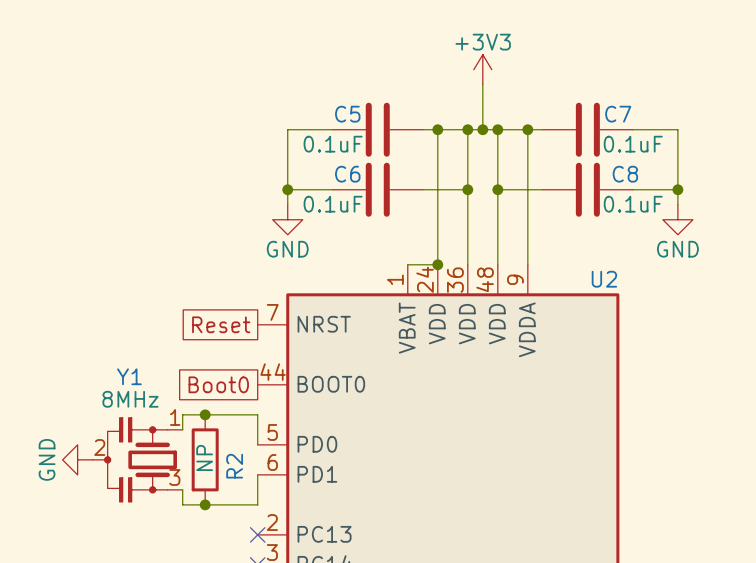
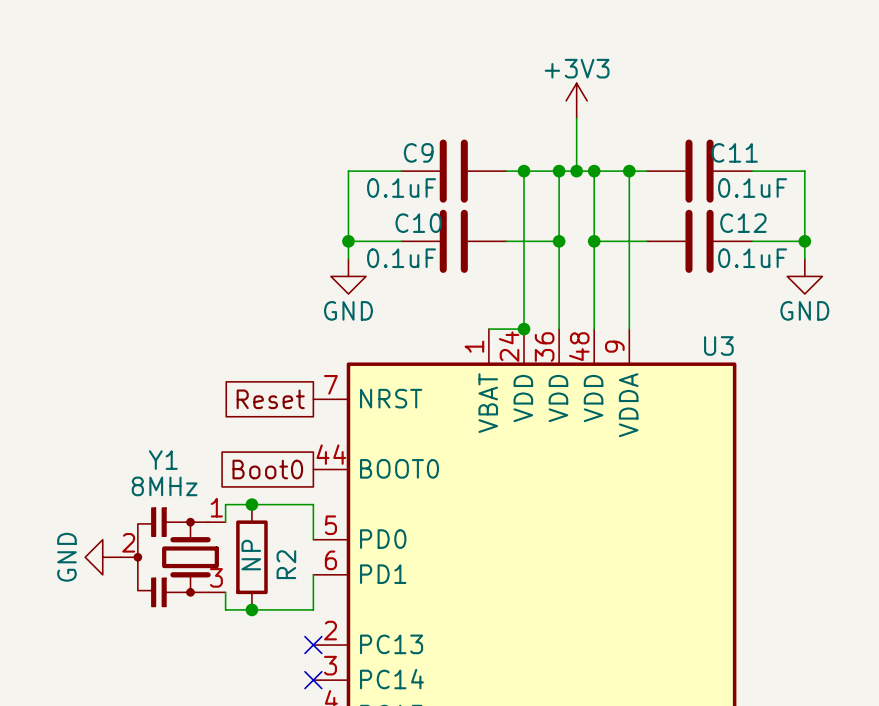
C5 name: C5 (347, 114) -> C9 (418, 152)
C7 name: C7 (618, 114) -> C11 (734, 152)
C6 name: C6 (347, 174) -> C10 (418, 223)
C8 name: C8 (625, 174) -> C12 (743, 223)
U2 name: U2 (604, 279) -> U3 (718, 345)

